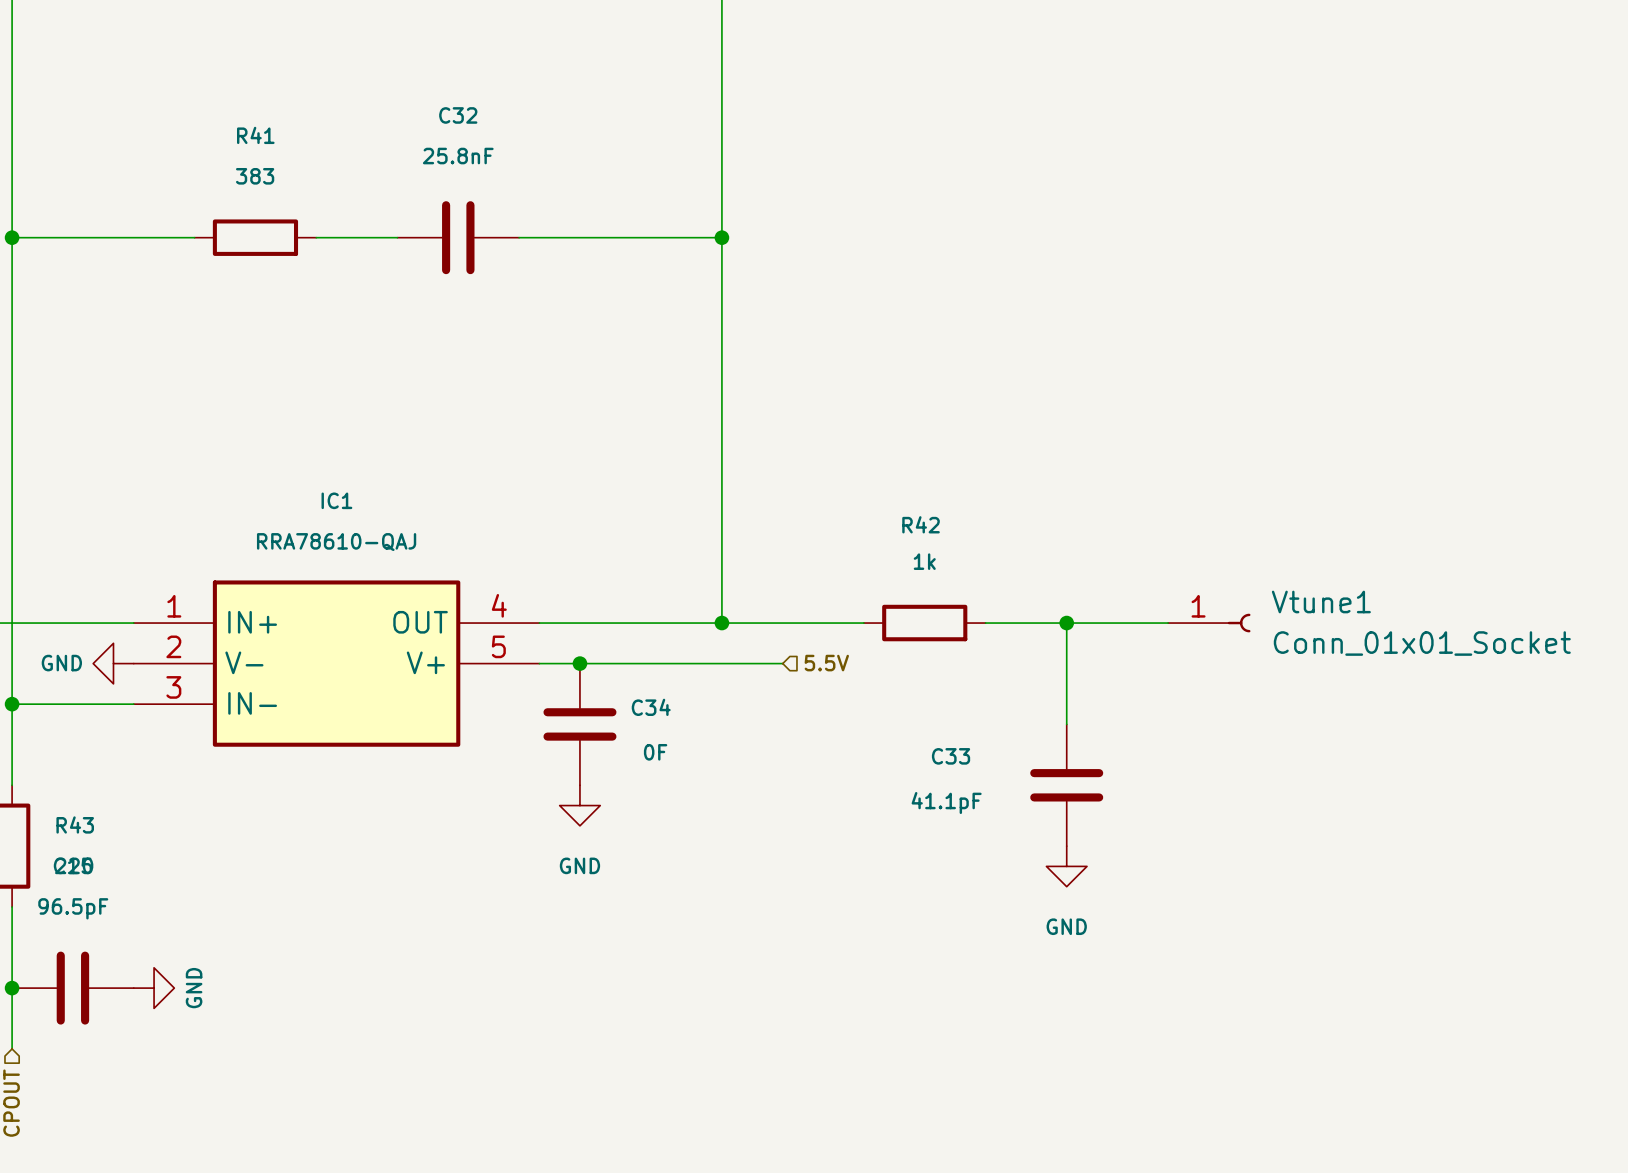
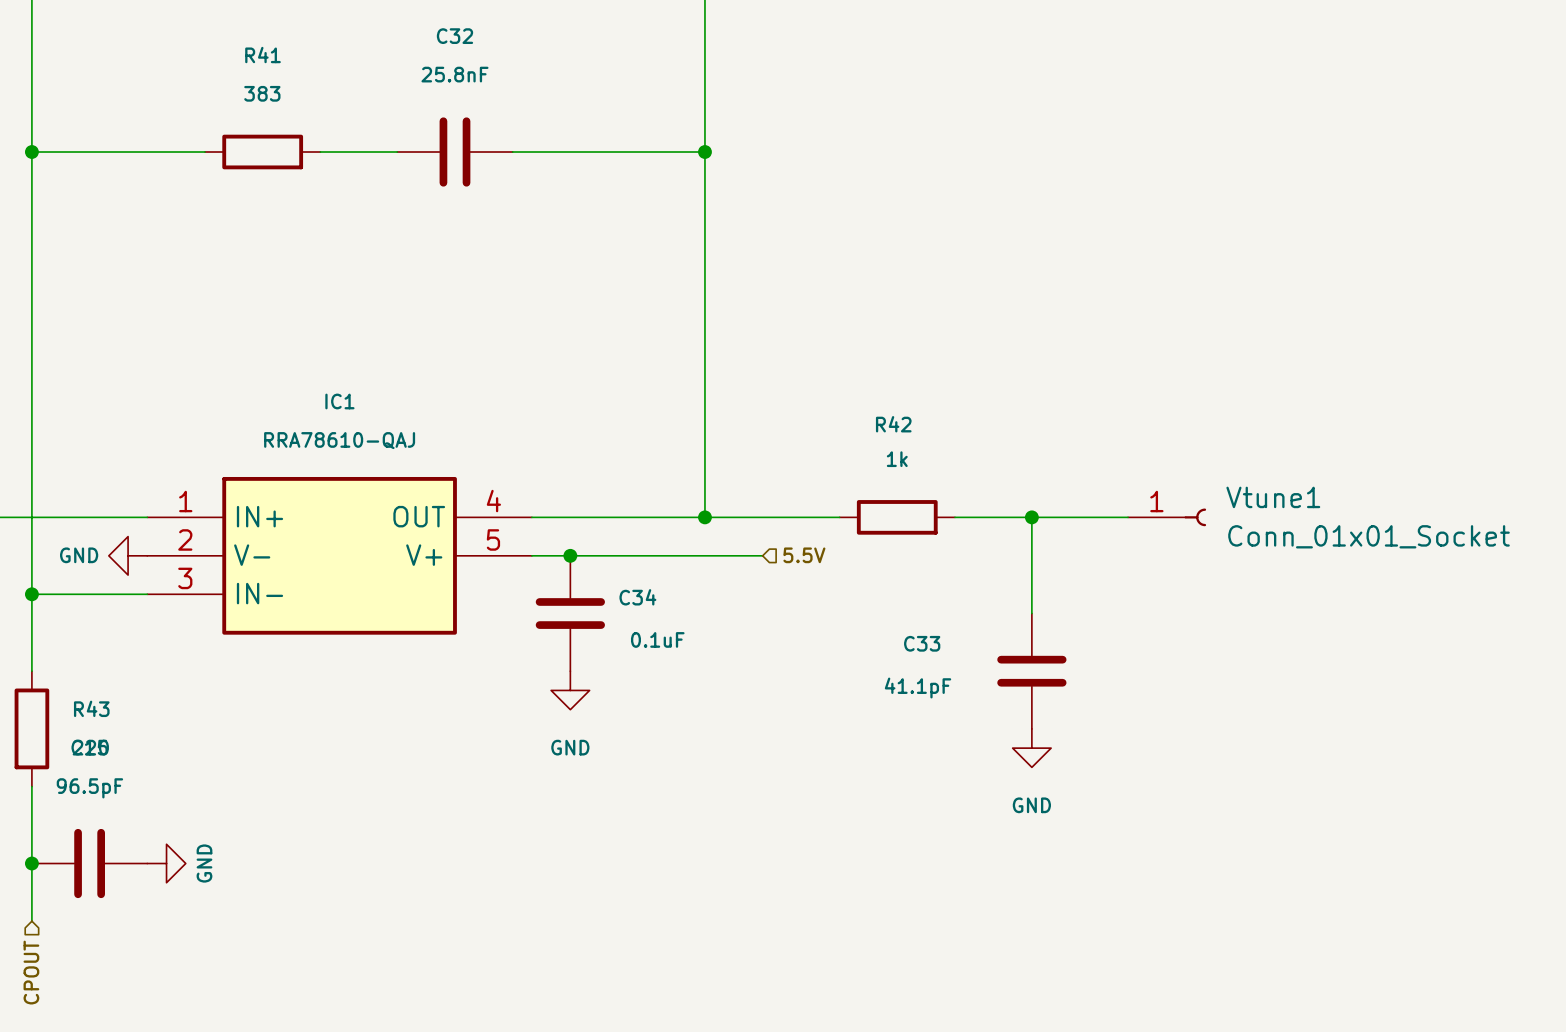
C34 value: 0F (655, 752) -> 0.1uF (657, 639)

